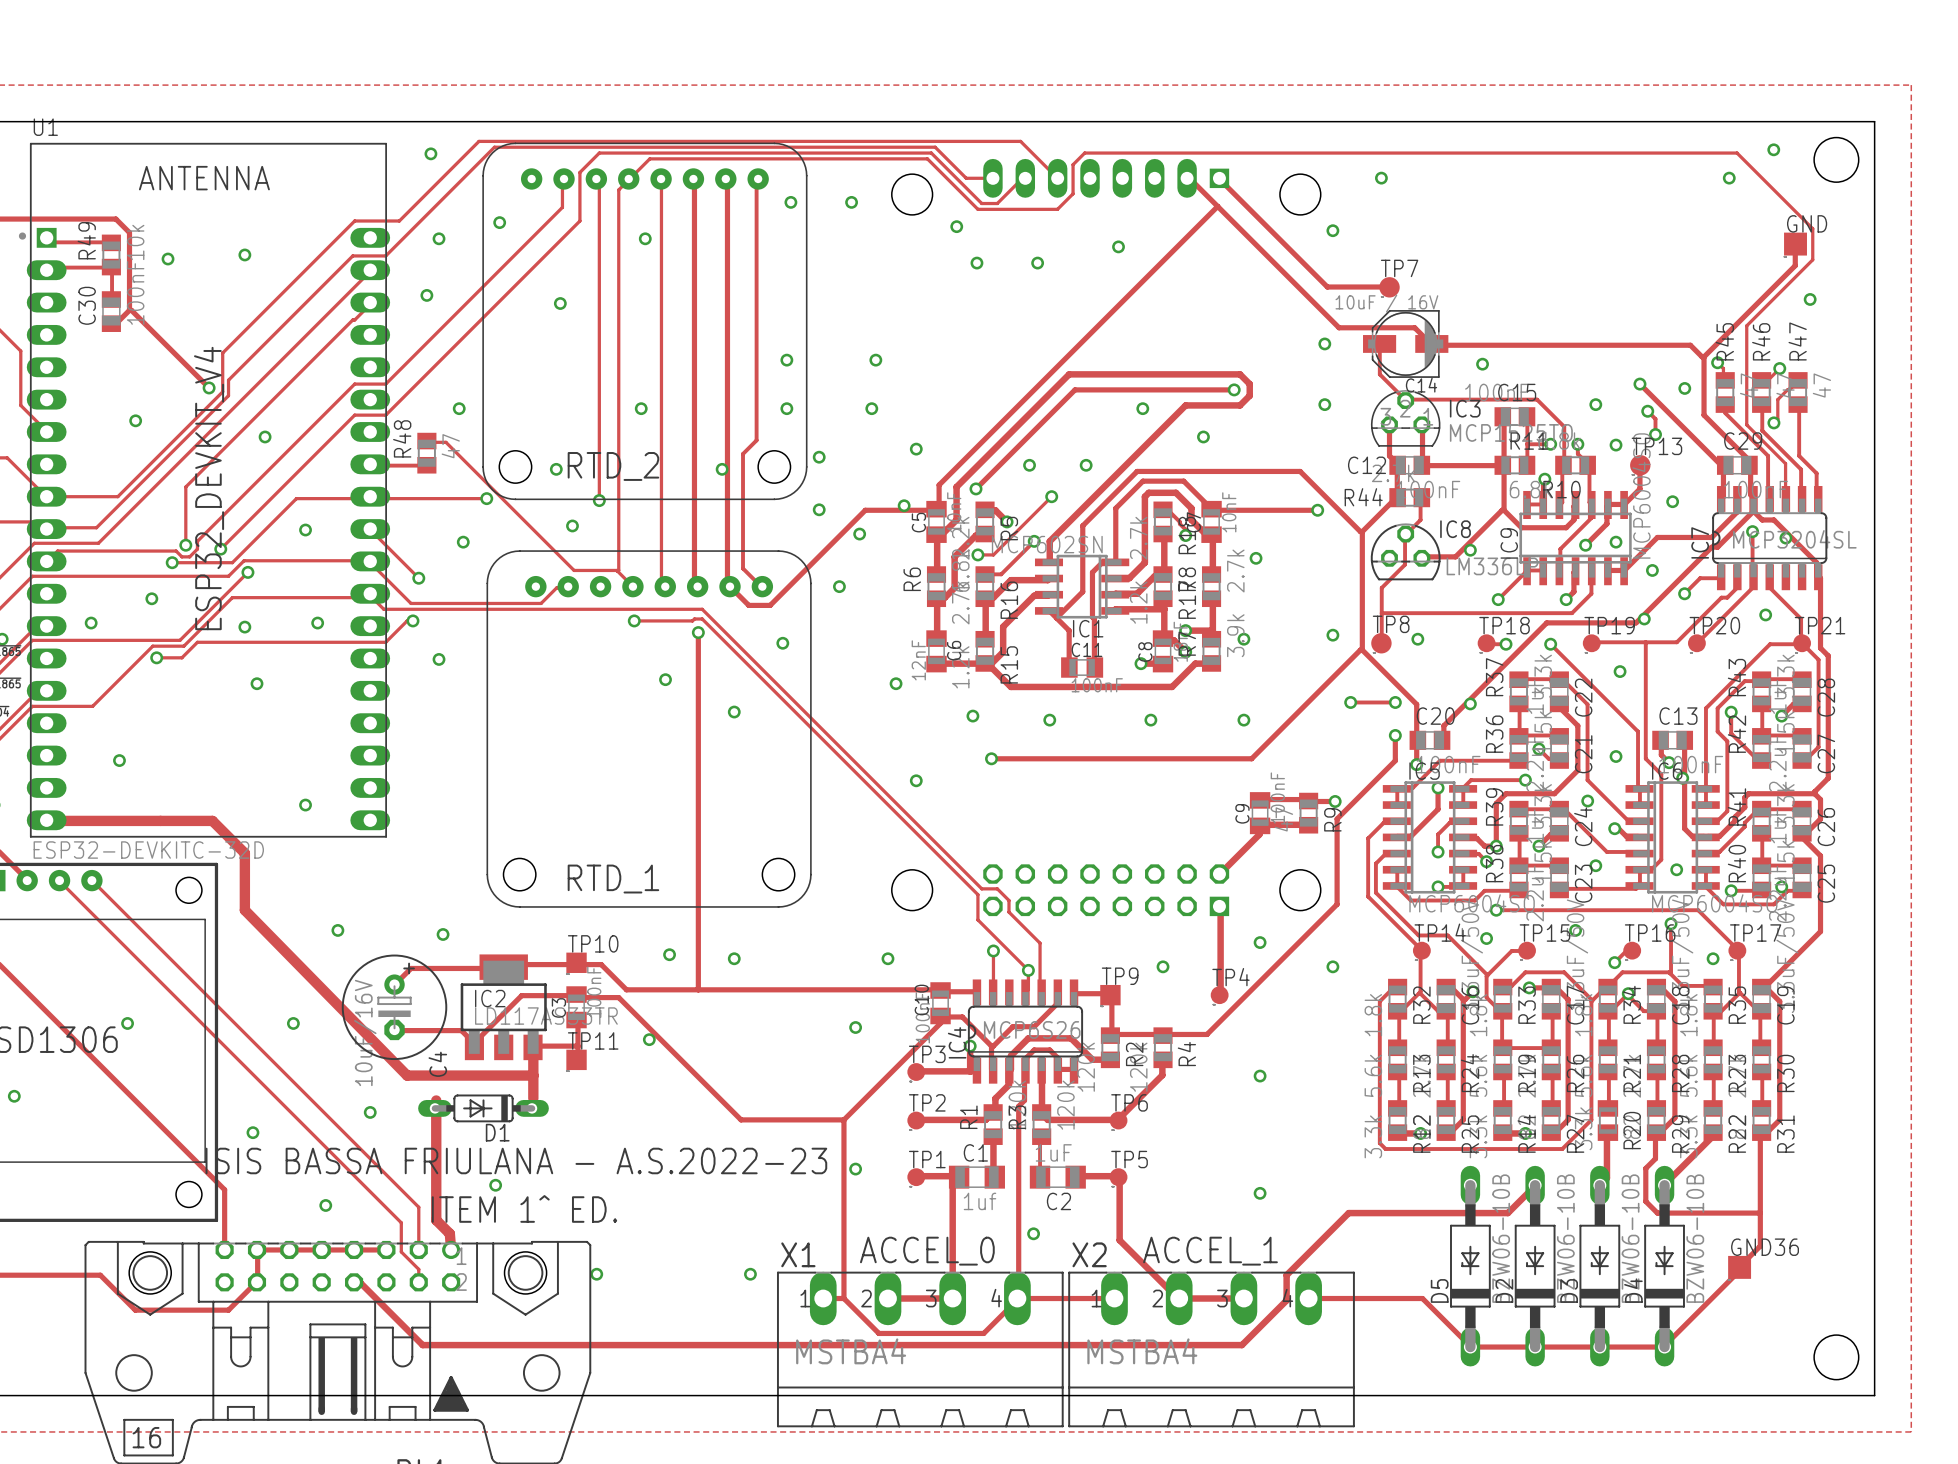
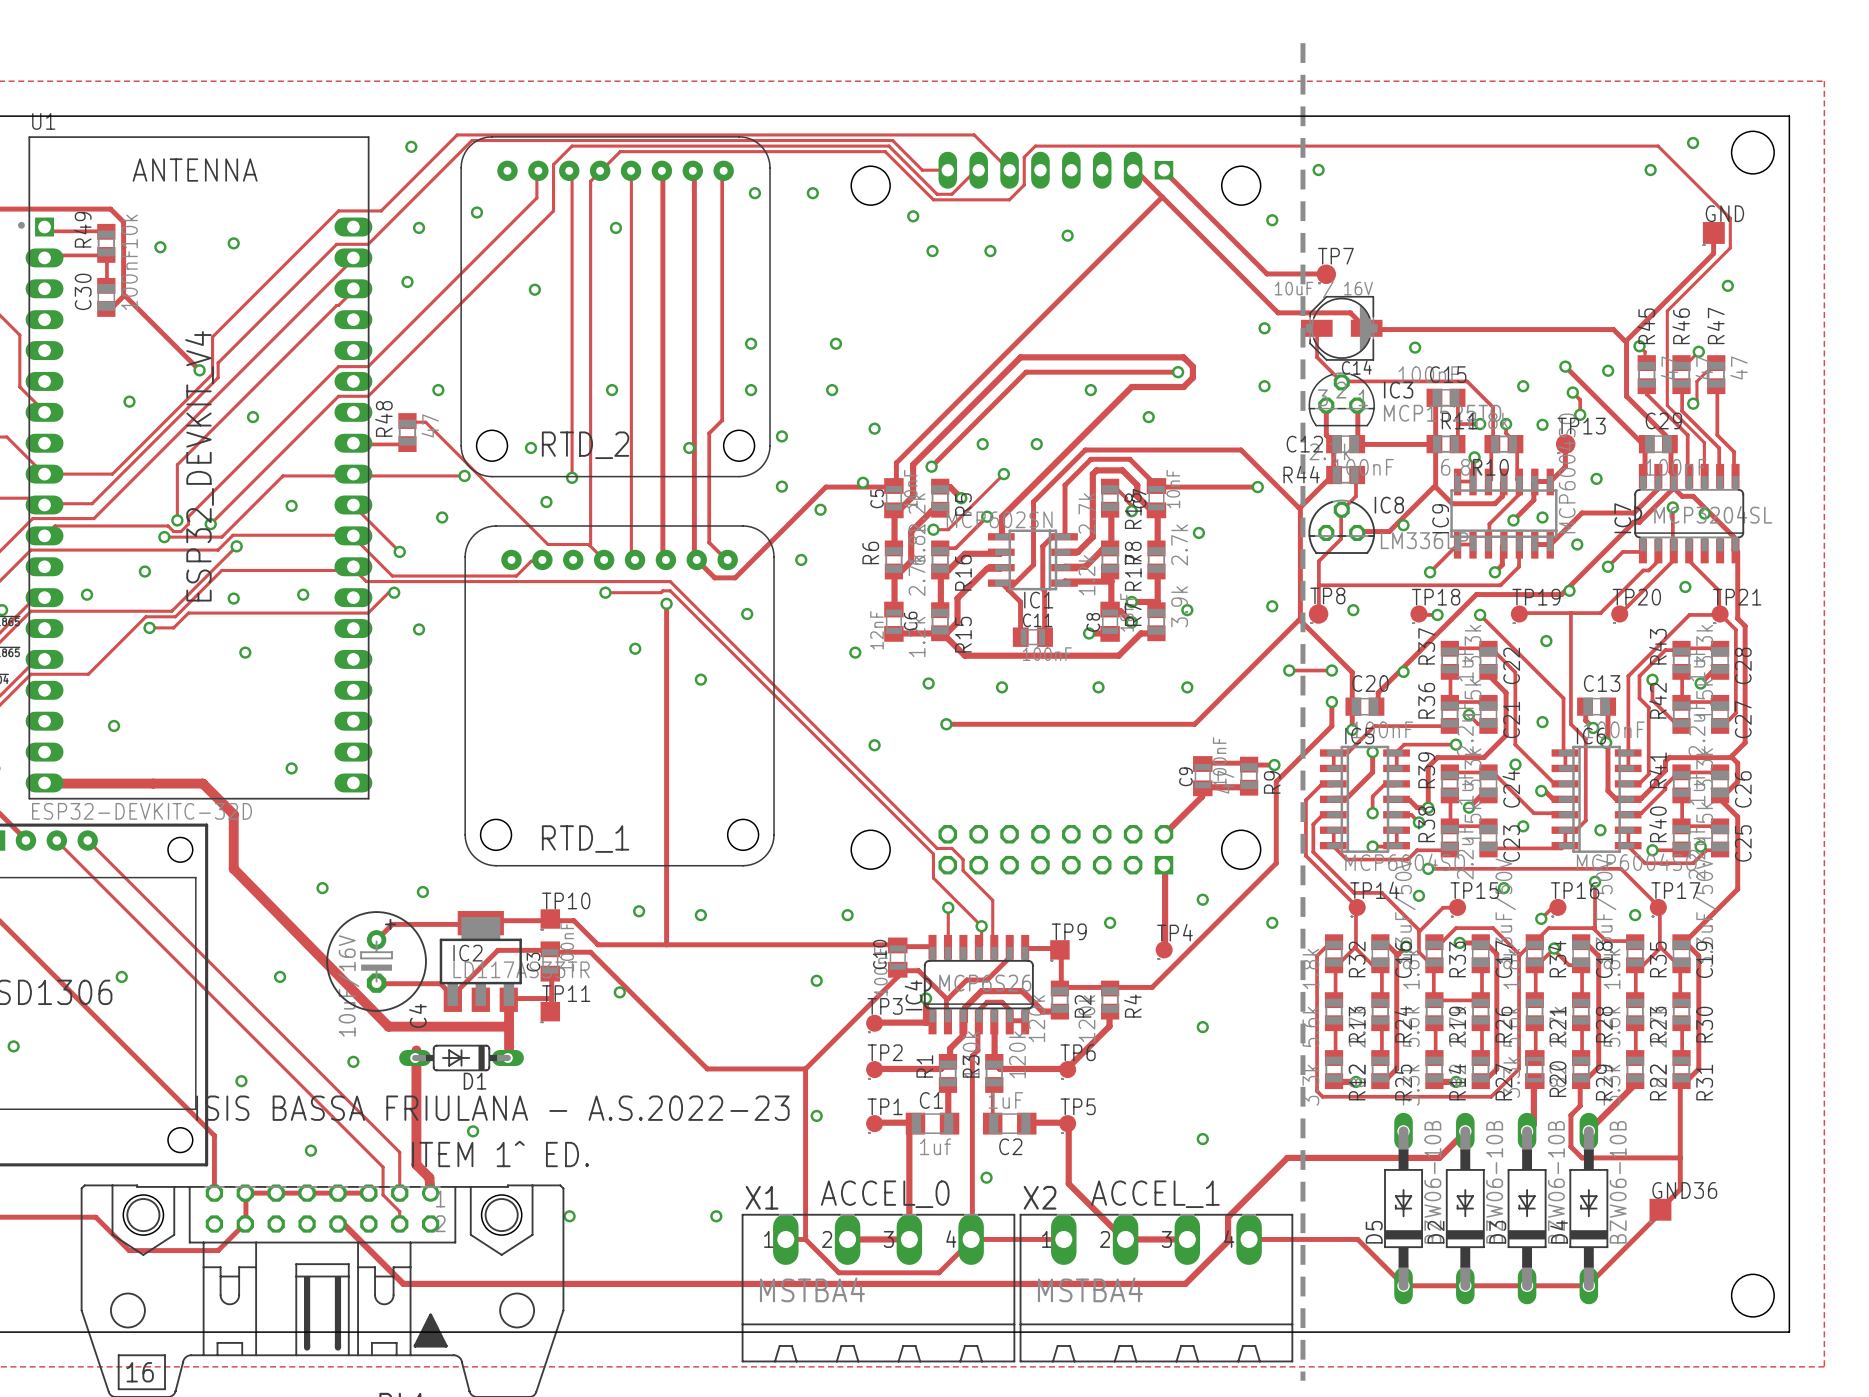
line: none -> (1302, 43) (1302, 1380)

